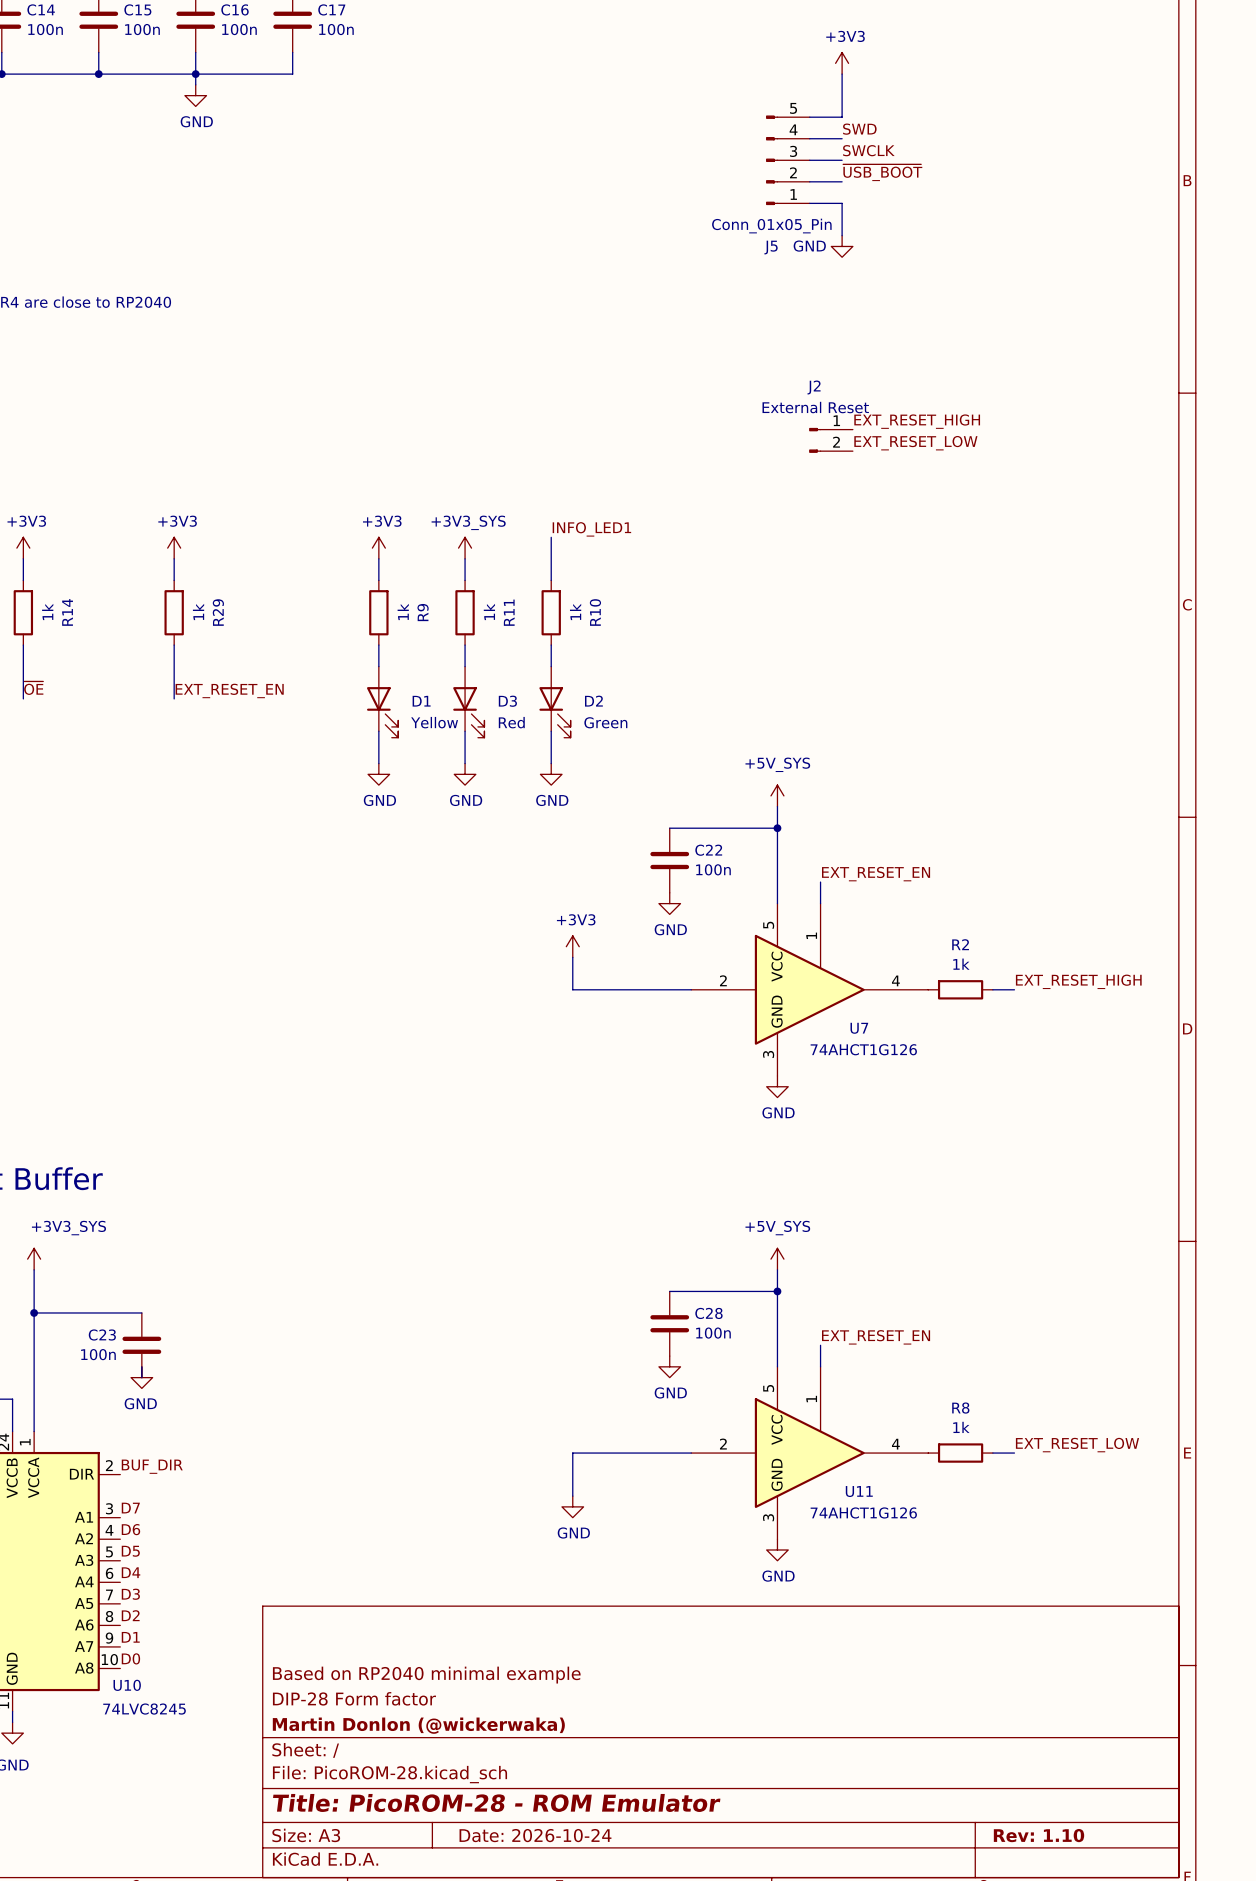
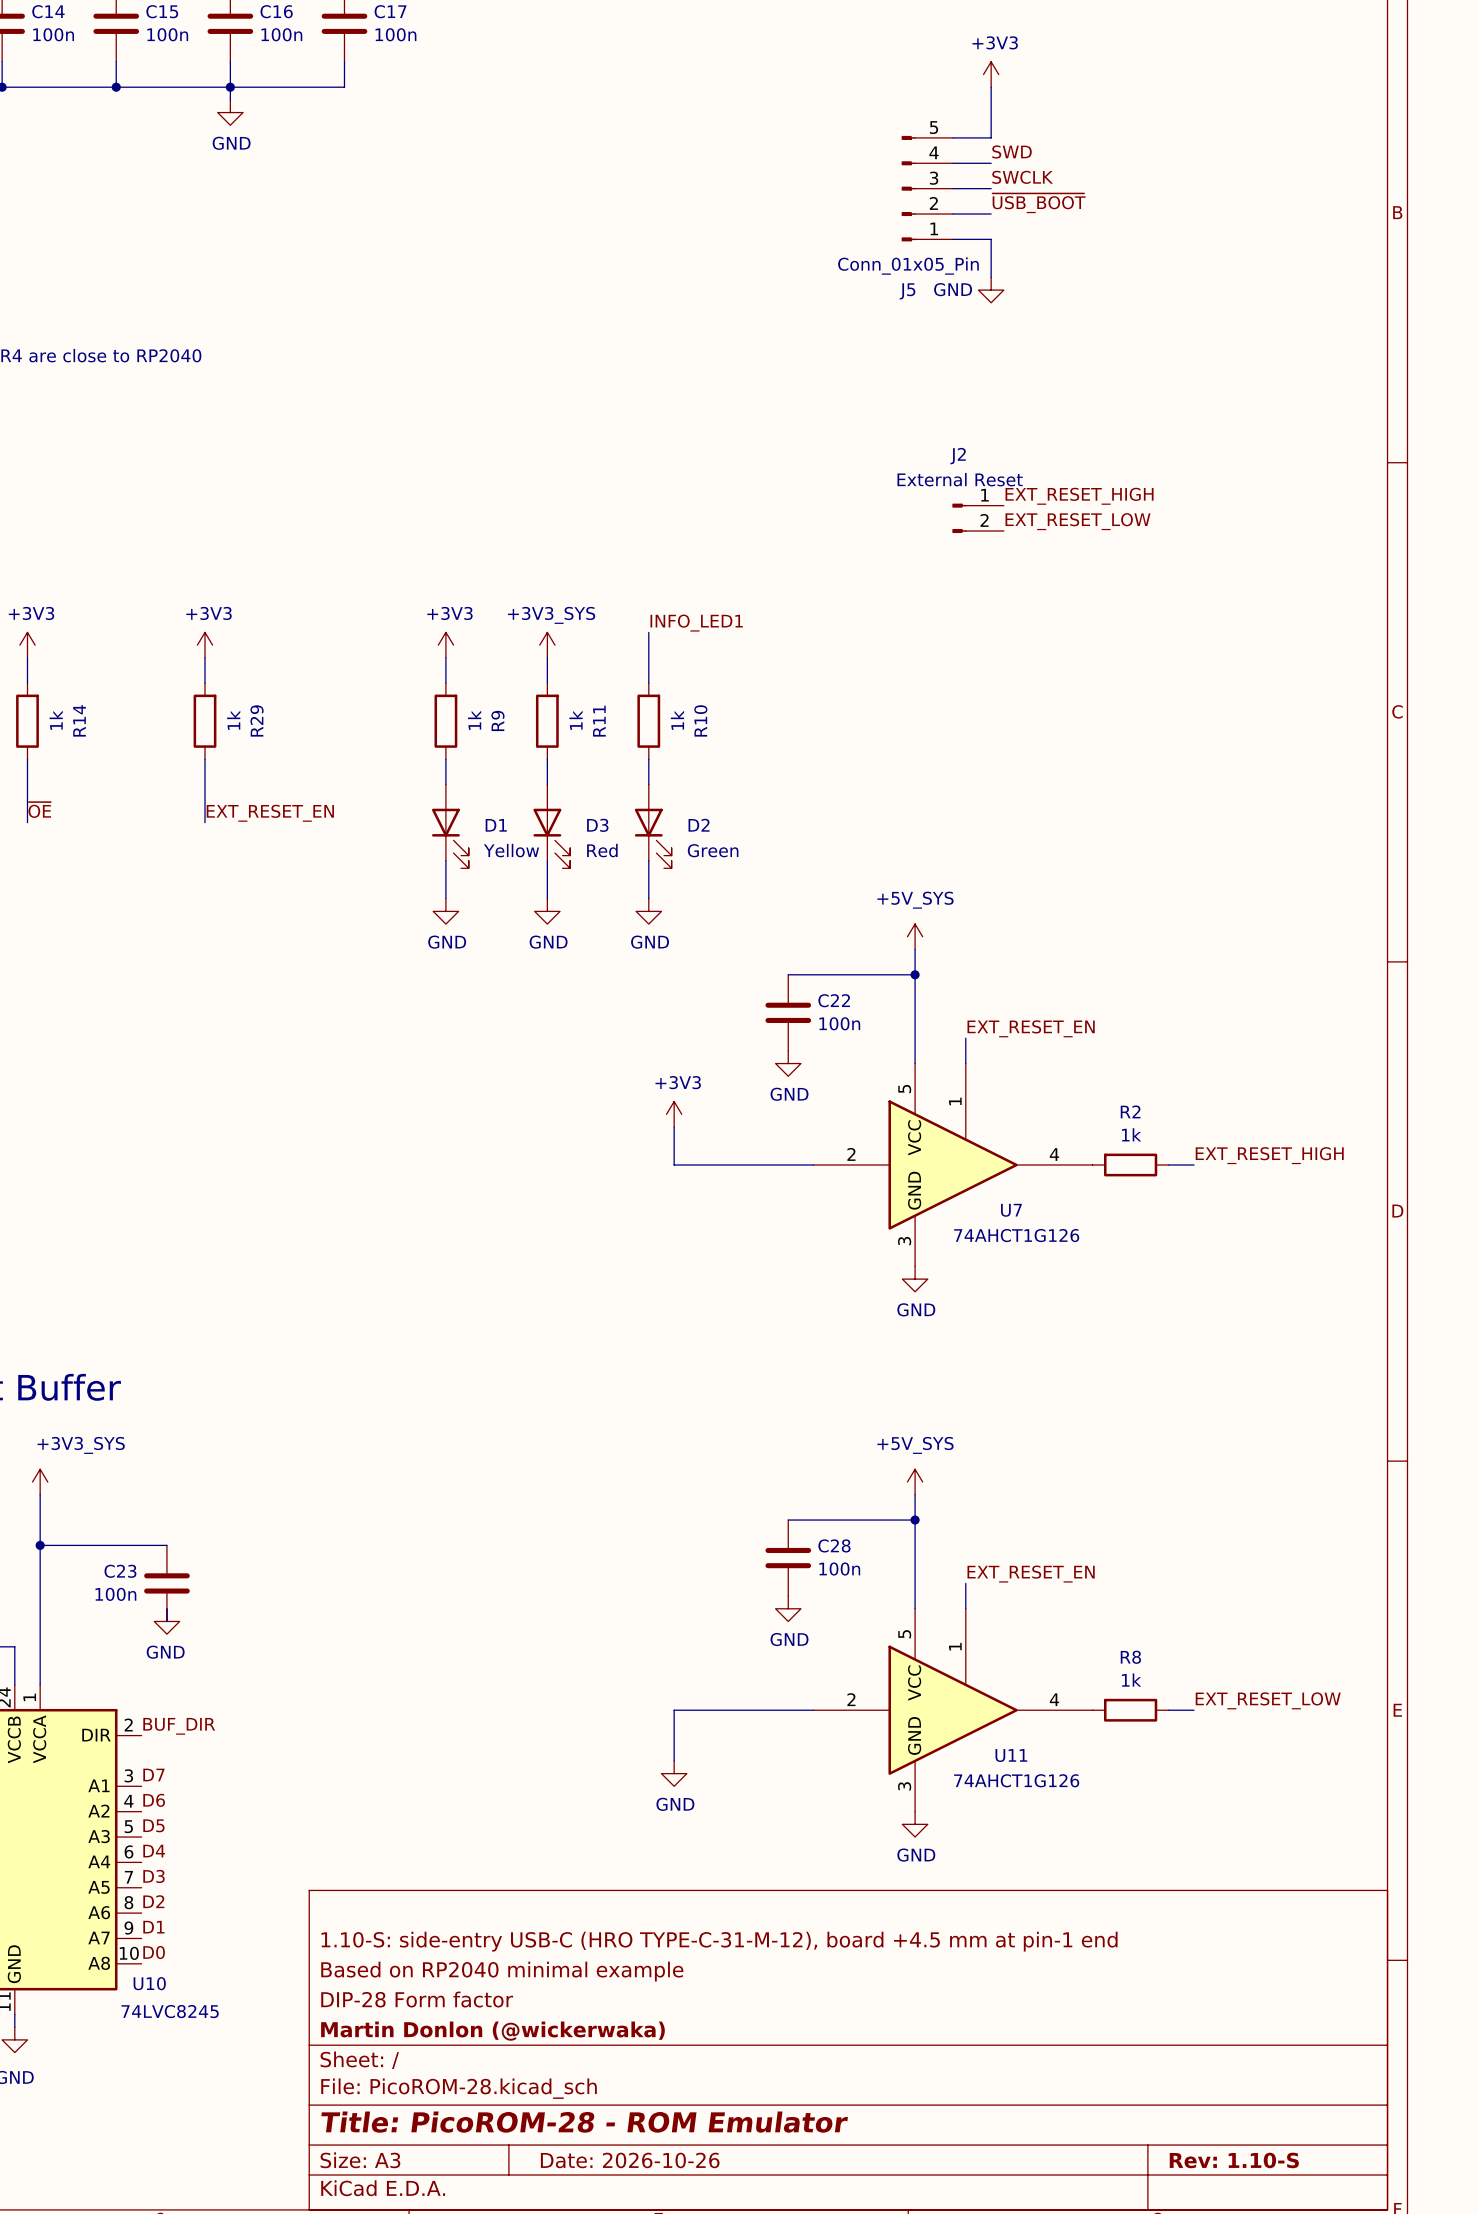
title block: none -> 1.10-S: side-entry USB-C (HRO TYPE-C-31-M-12), board +4.5 mm at pin-1 end (719, 1941)
title block: Date: 2026-10-24 (535, 1835) -> Date: 2026-10-26 (630, 2160)
title block: Rev: 1.10 (1039, 1835) -> Rev: 1.10-S (1234, 2160)

